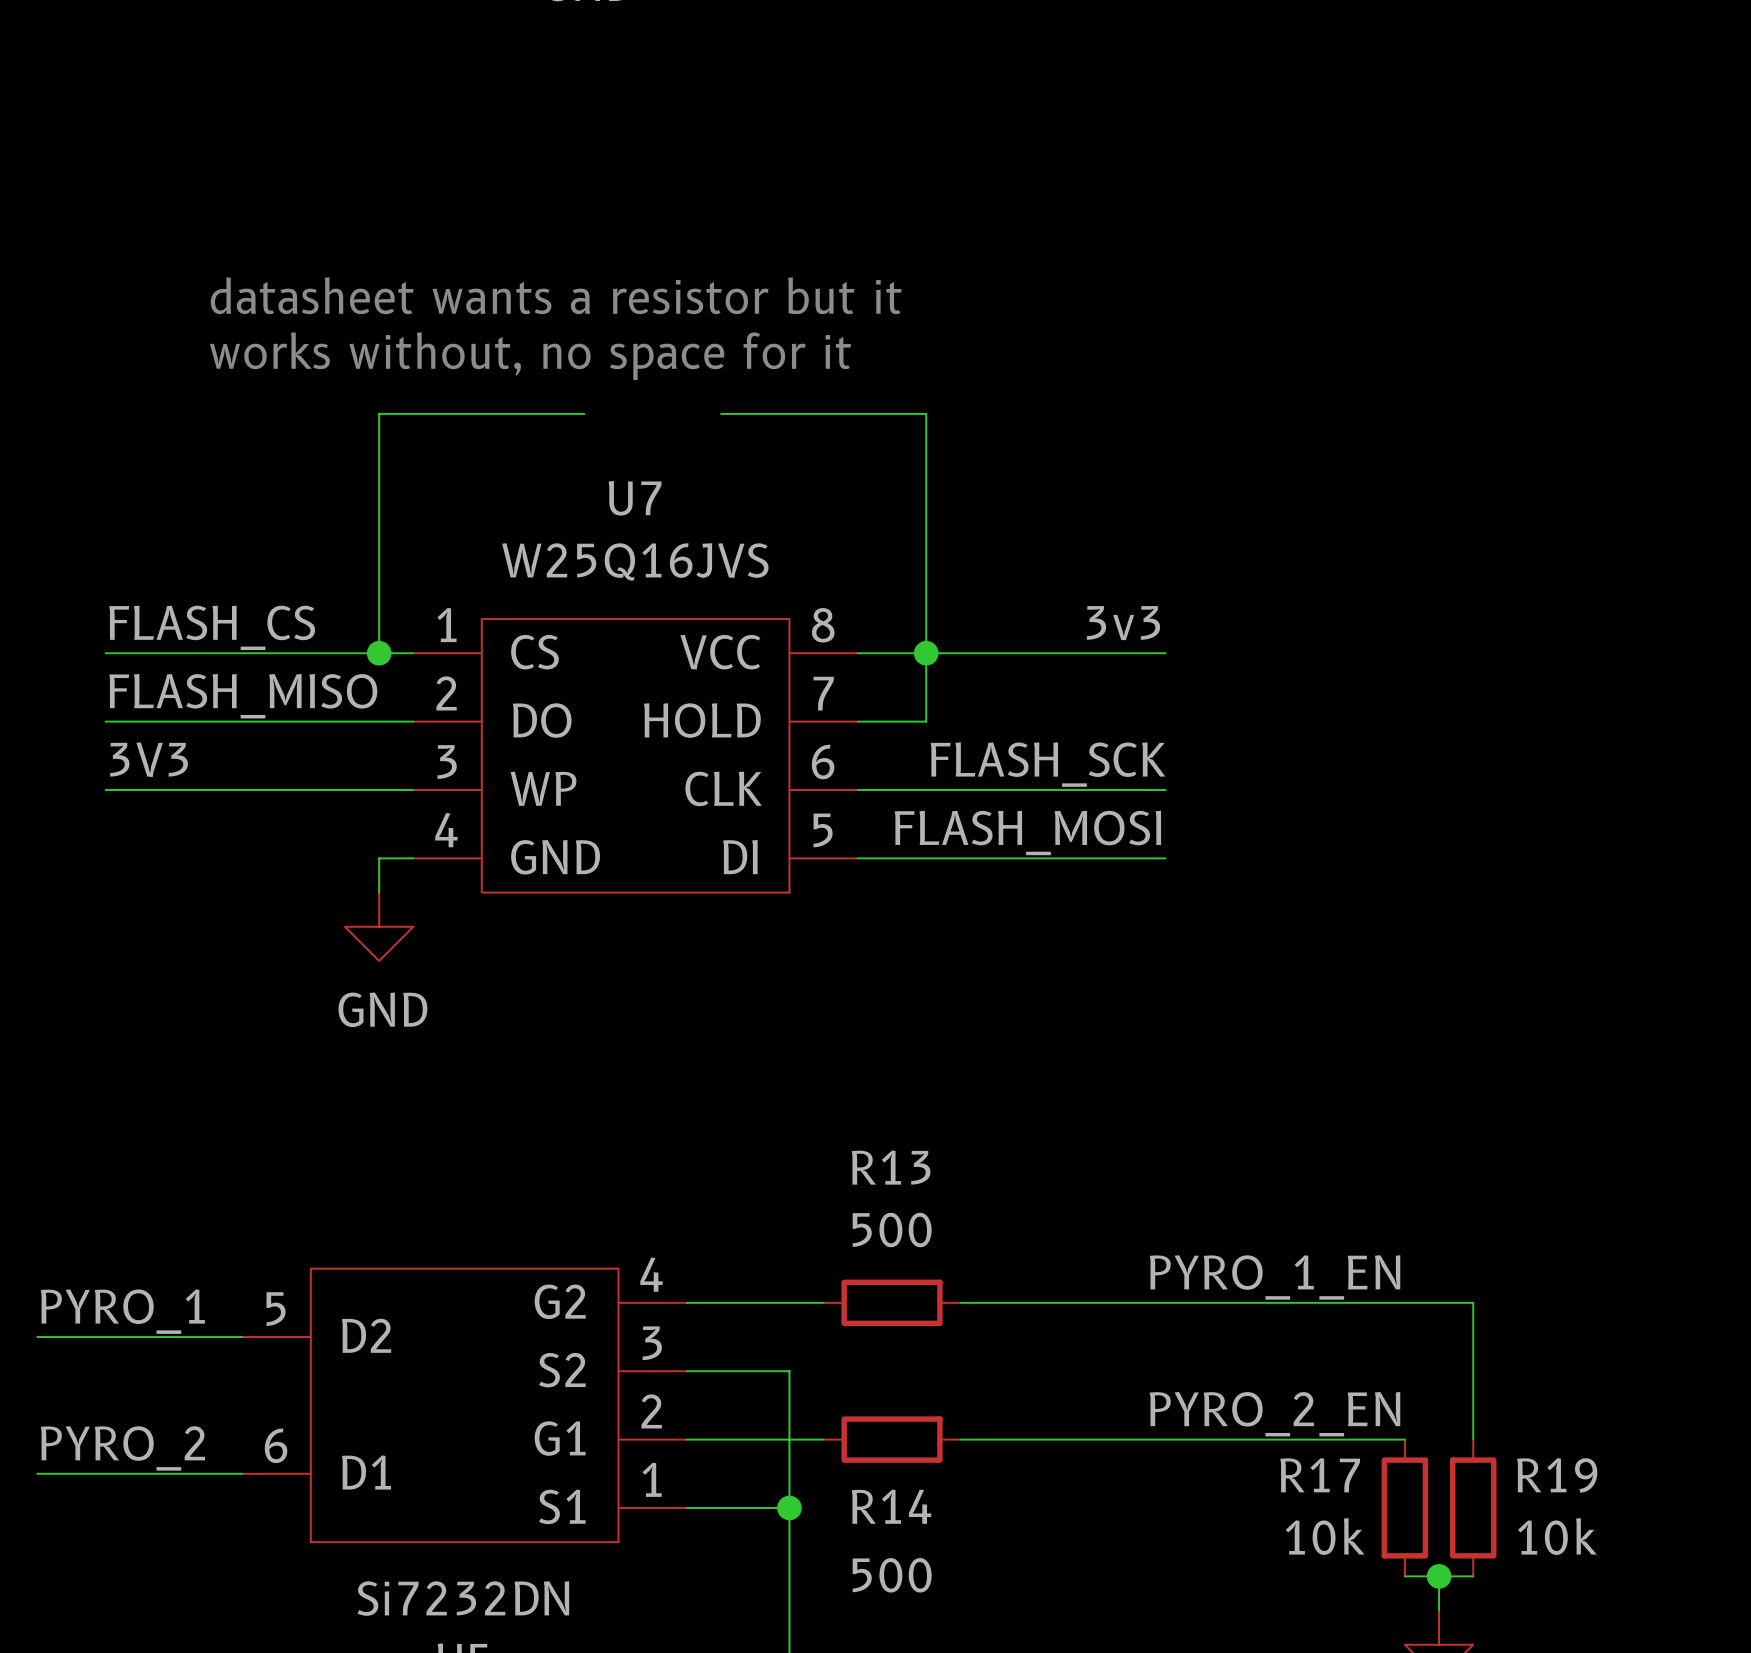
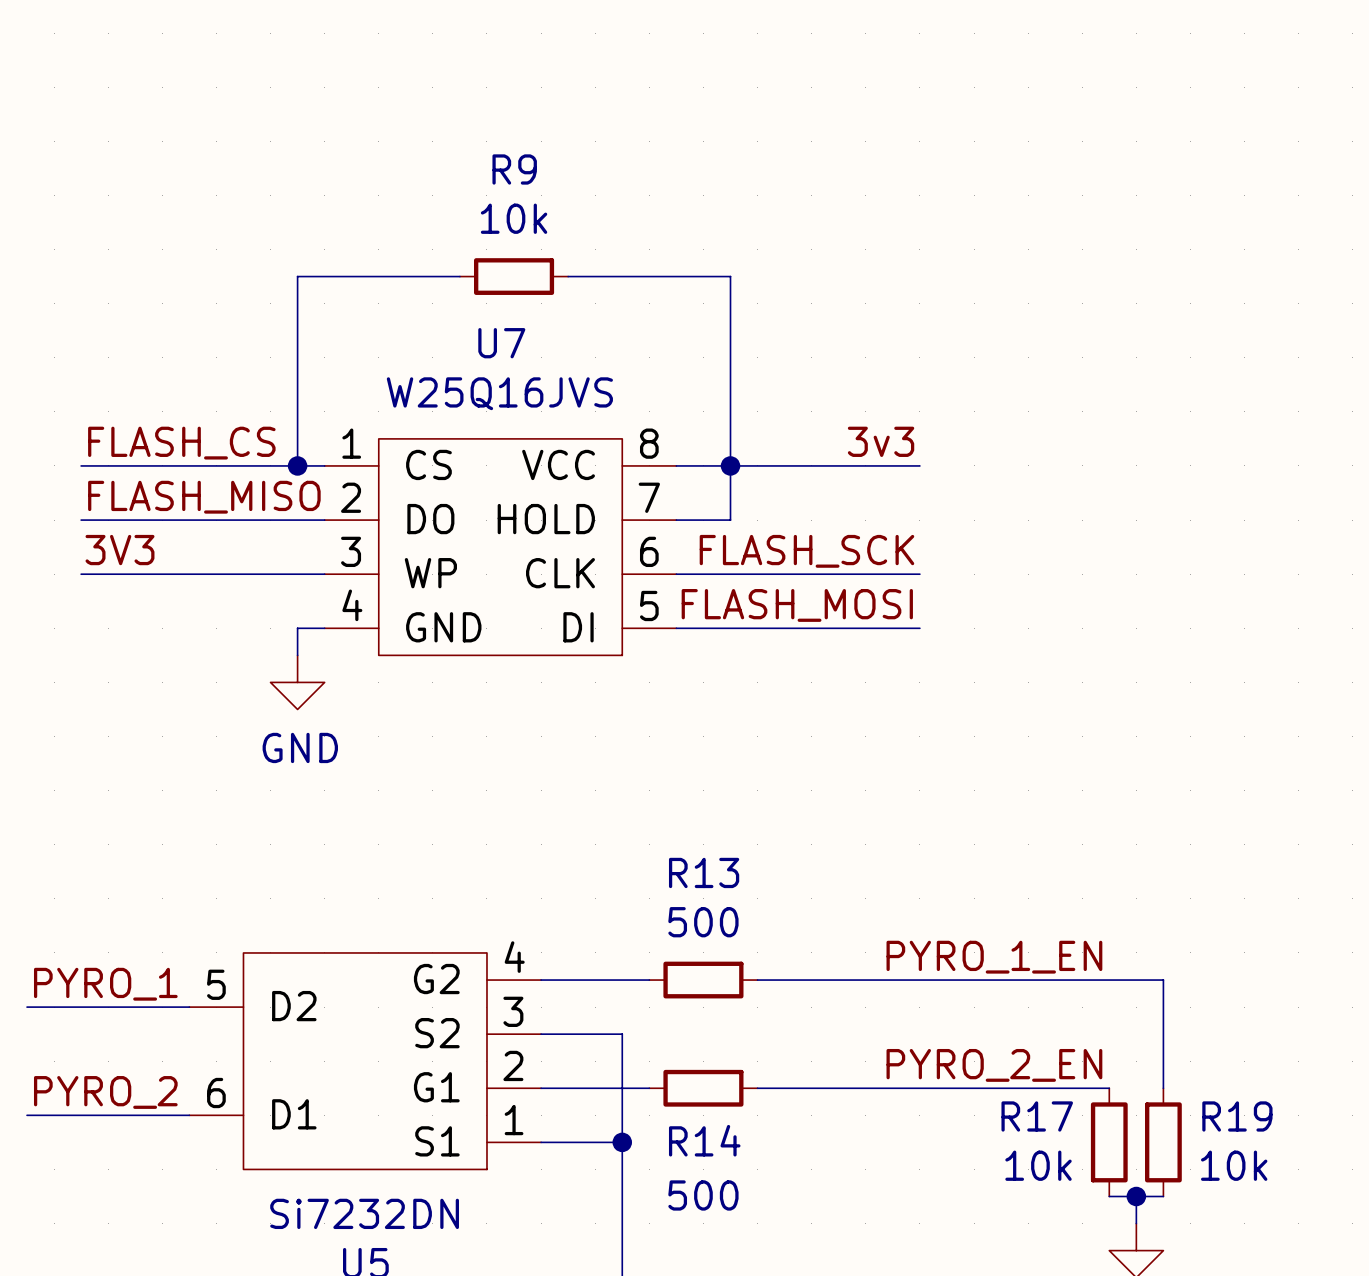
text: datasheet wants a resistor but it (556, 295) -> none
text: works without, no space for it (530, 356) -> none
R9: none -> 10k (514, 276)

